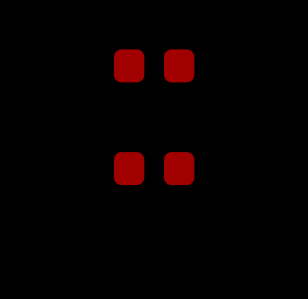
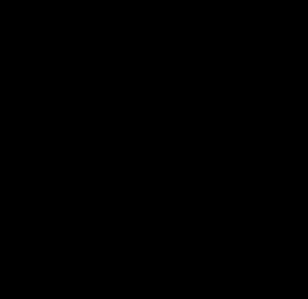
part: (154, 65) -> none
part: (154, 168) -> none

